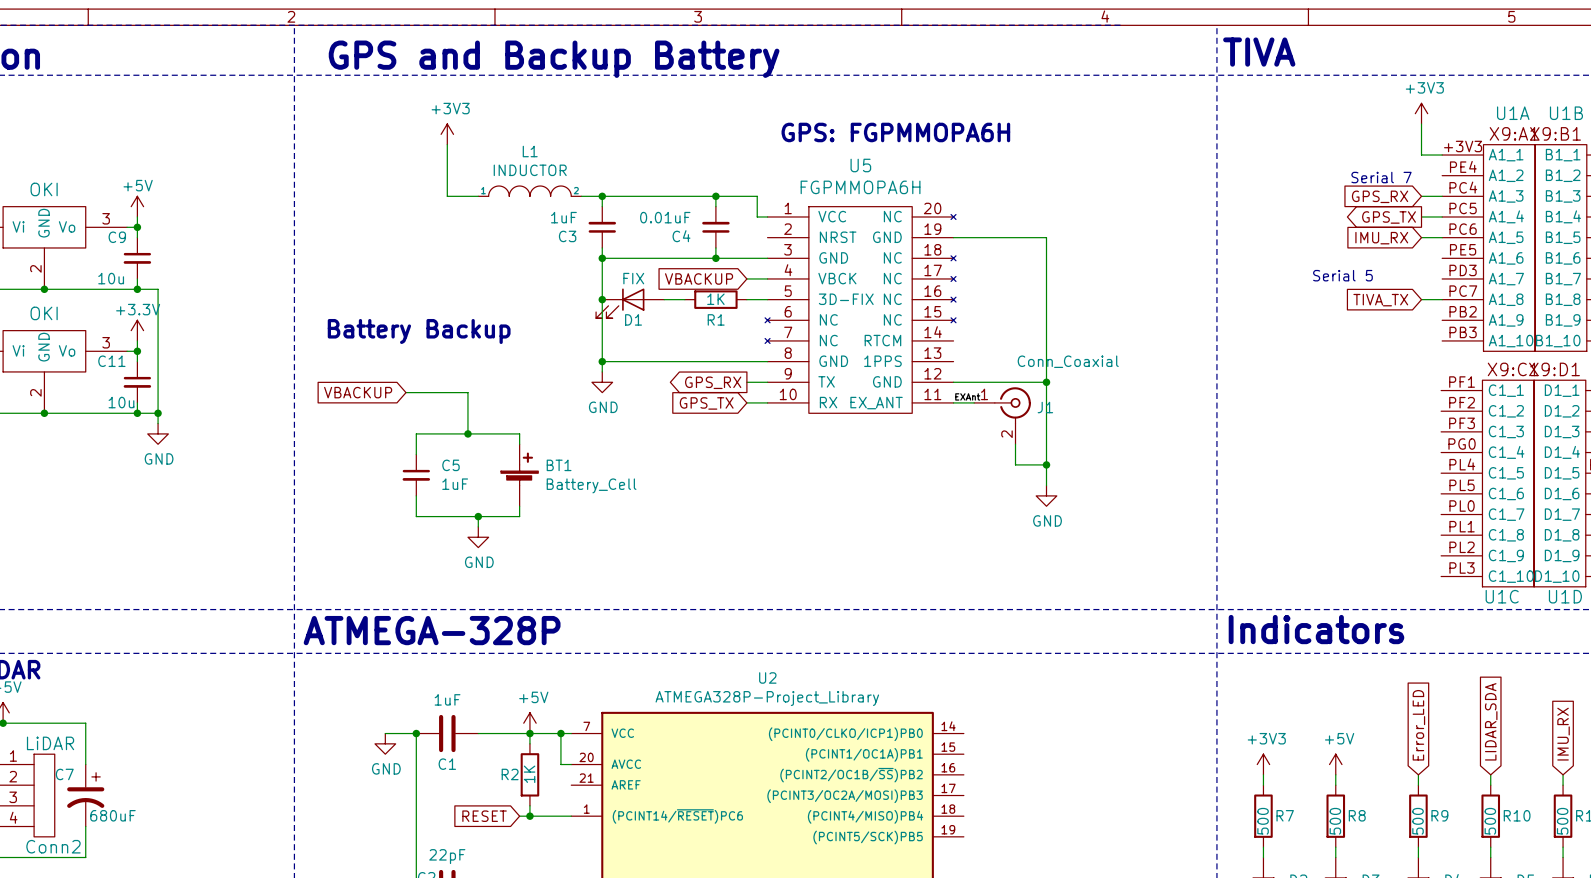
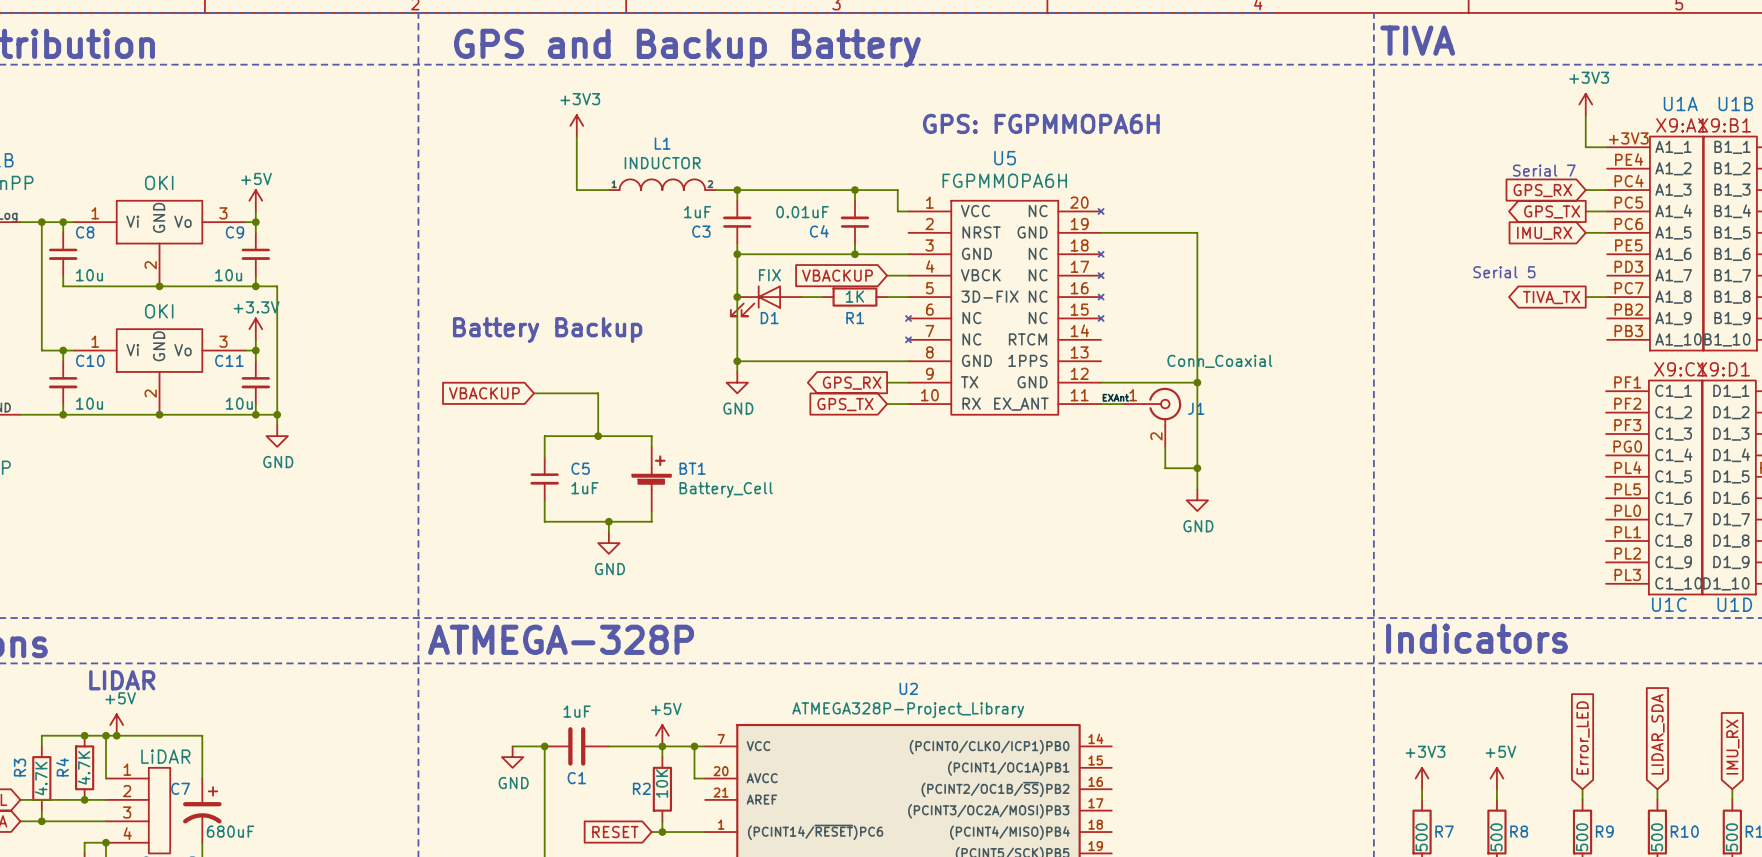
global label shape: input (1380, 300) -> output (1551, 297)
R2 value: 1K (529, 774) -> 10K (661, 783)

